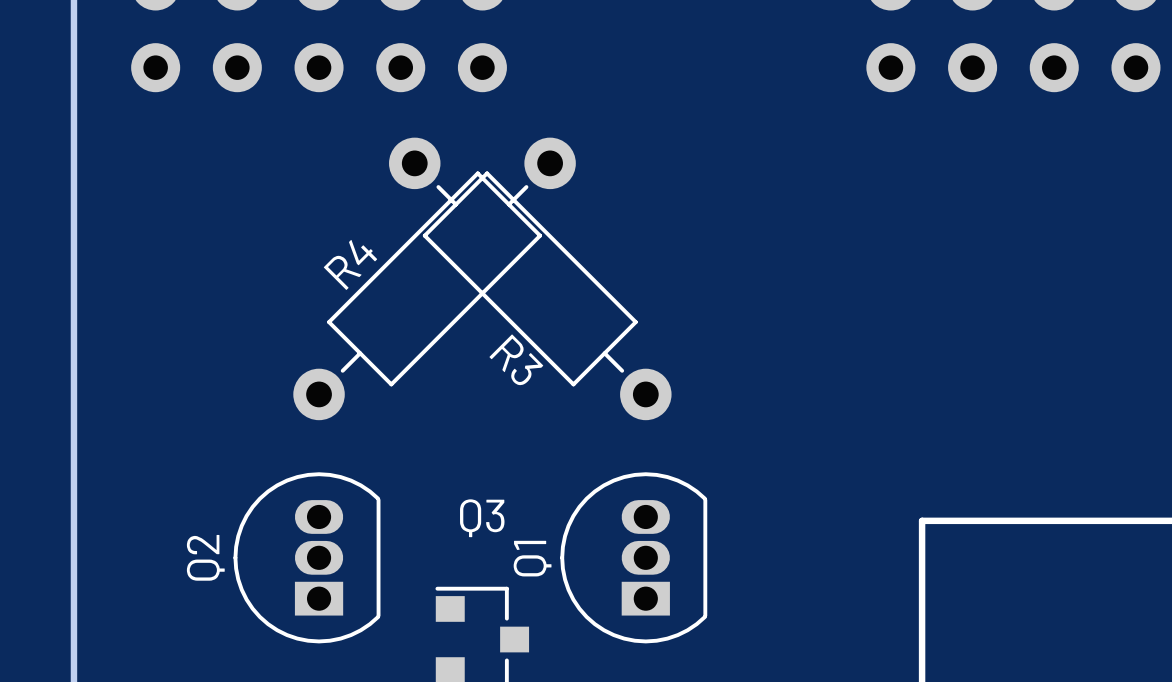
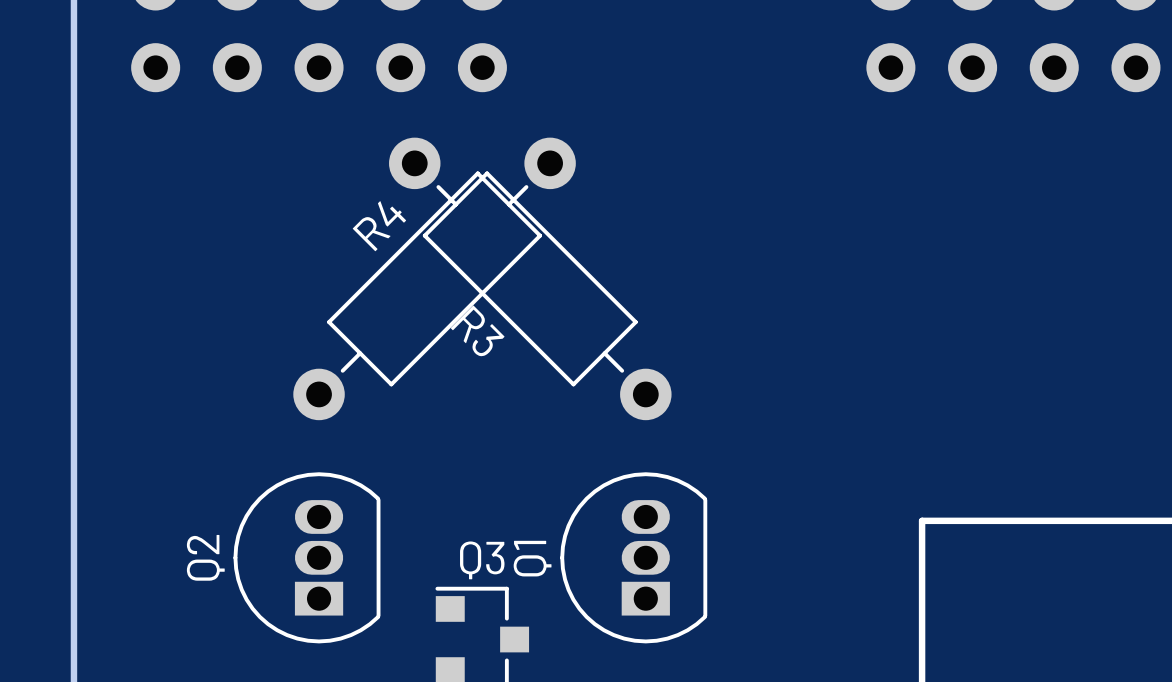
R4 name position: R4 (350, 265) -> R4 (379, 226)
R3 name position: R3 (516, 359) -> R3 (477, 330)
Q3 name position: Q3 (482, 518) -> Q3 (482, 560)

